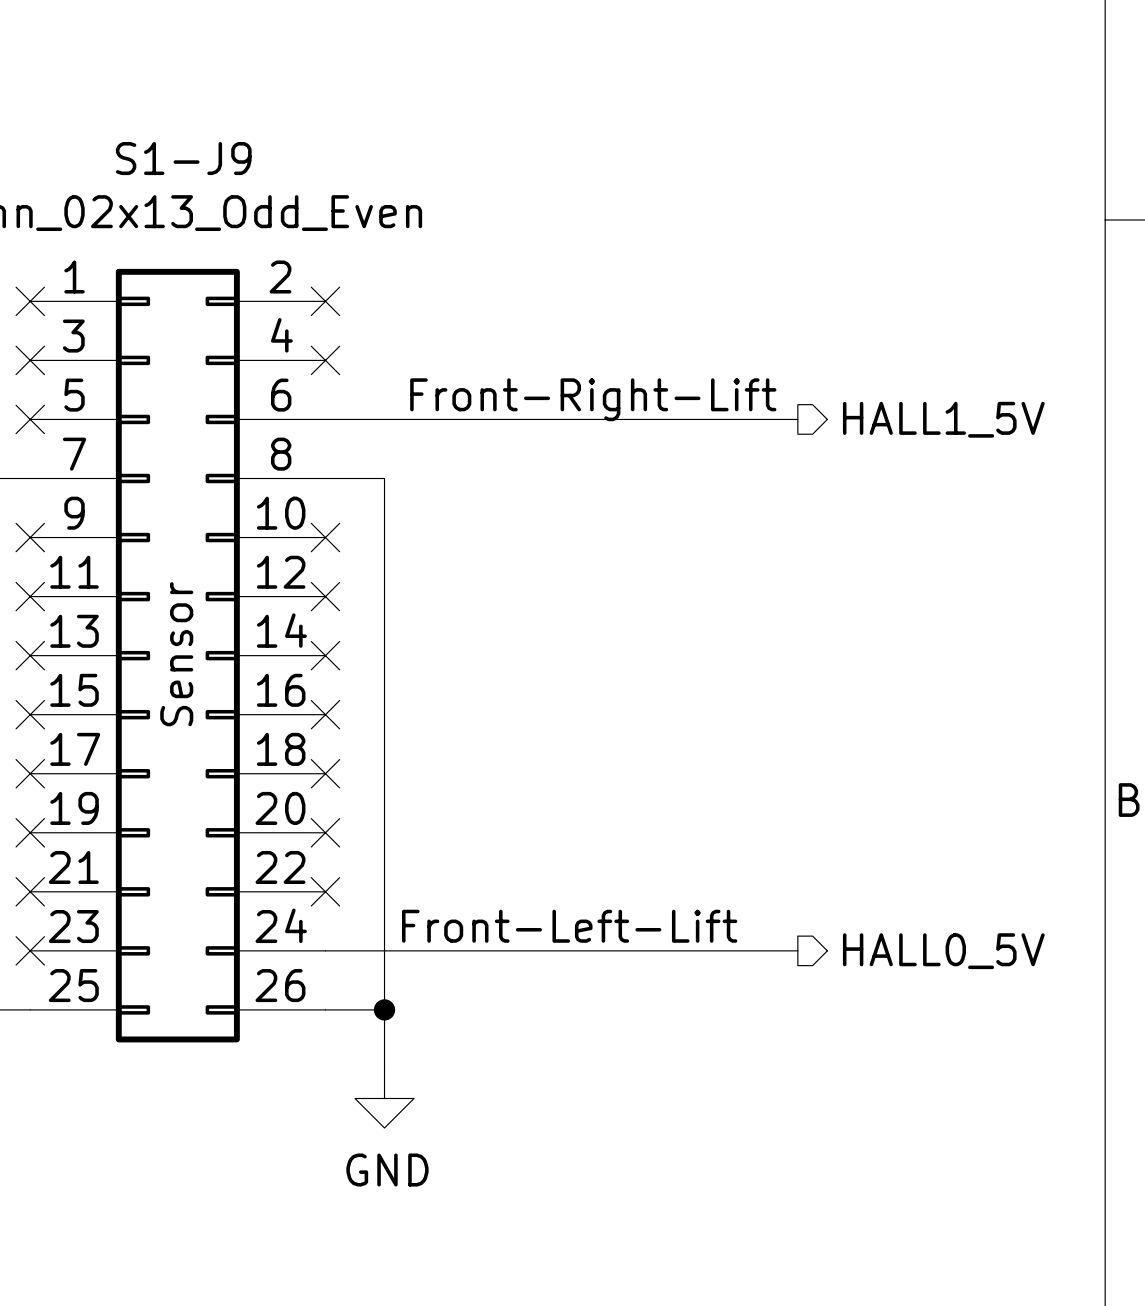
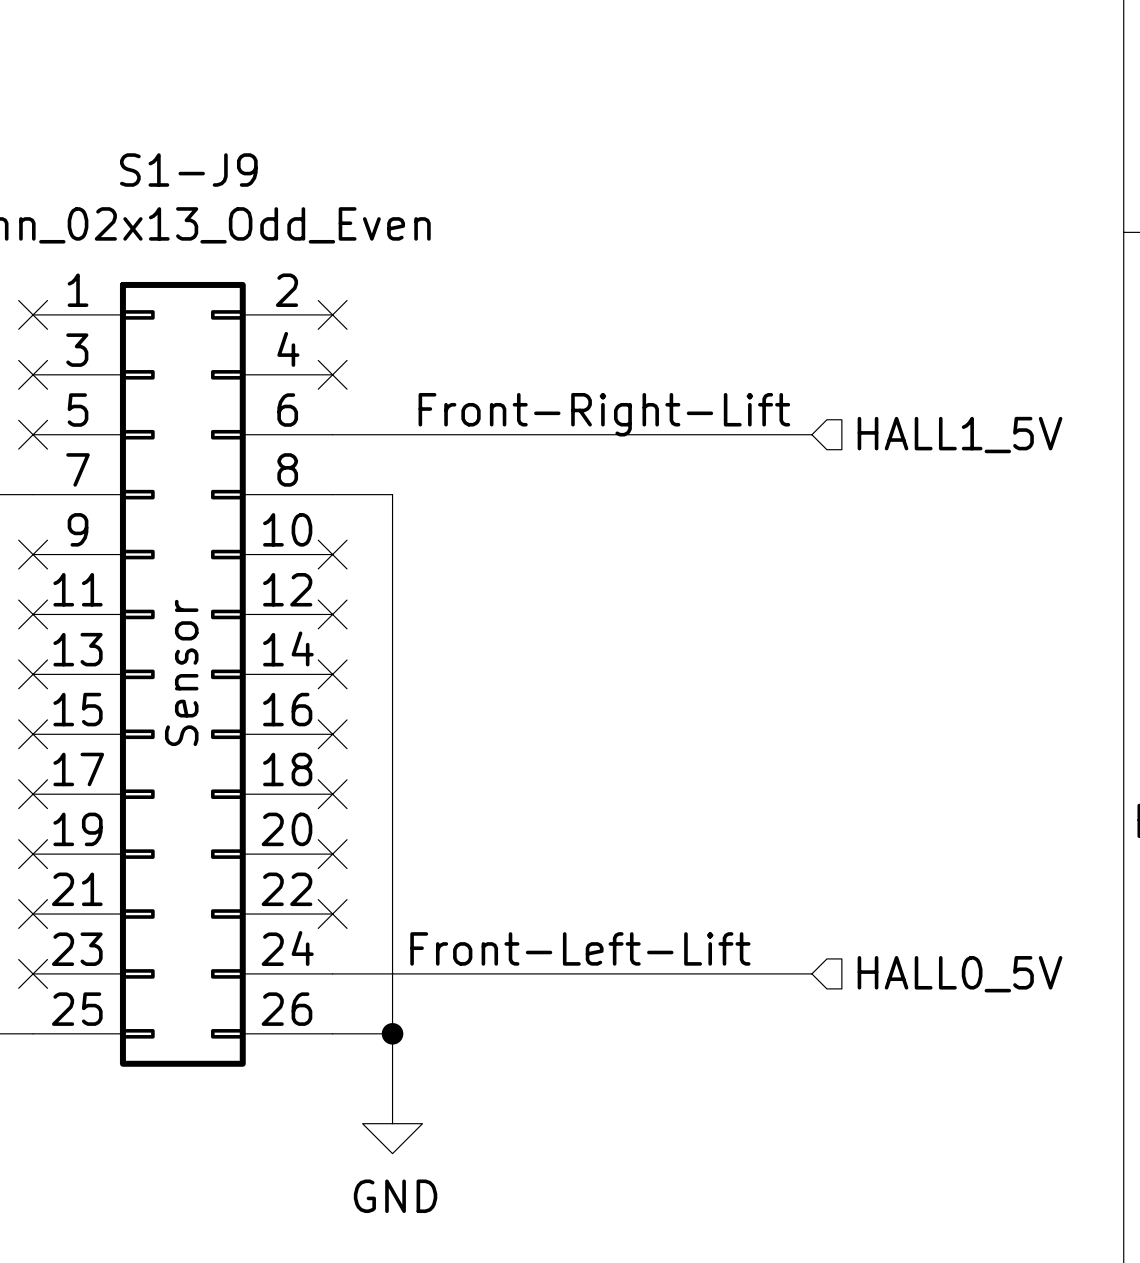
hierarchical label shape: output (943, 419) -> input (960, 435)
hierarchical label shape: output (943, 951) -> input (960, 974)

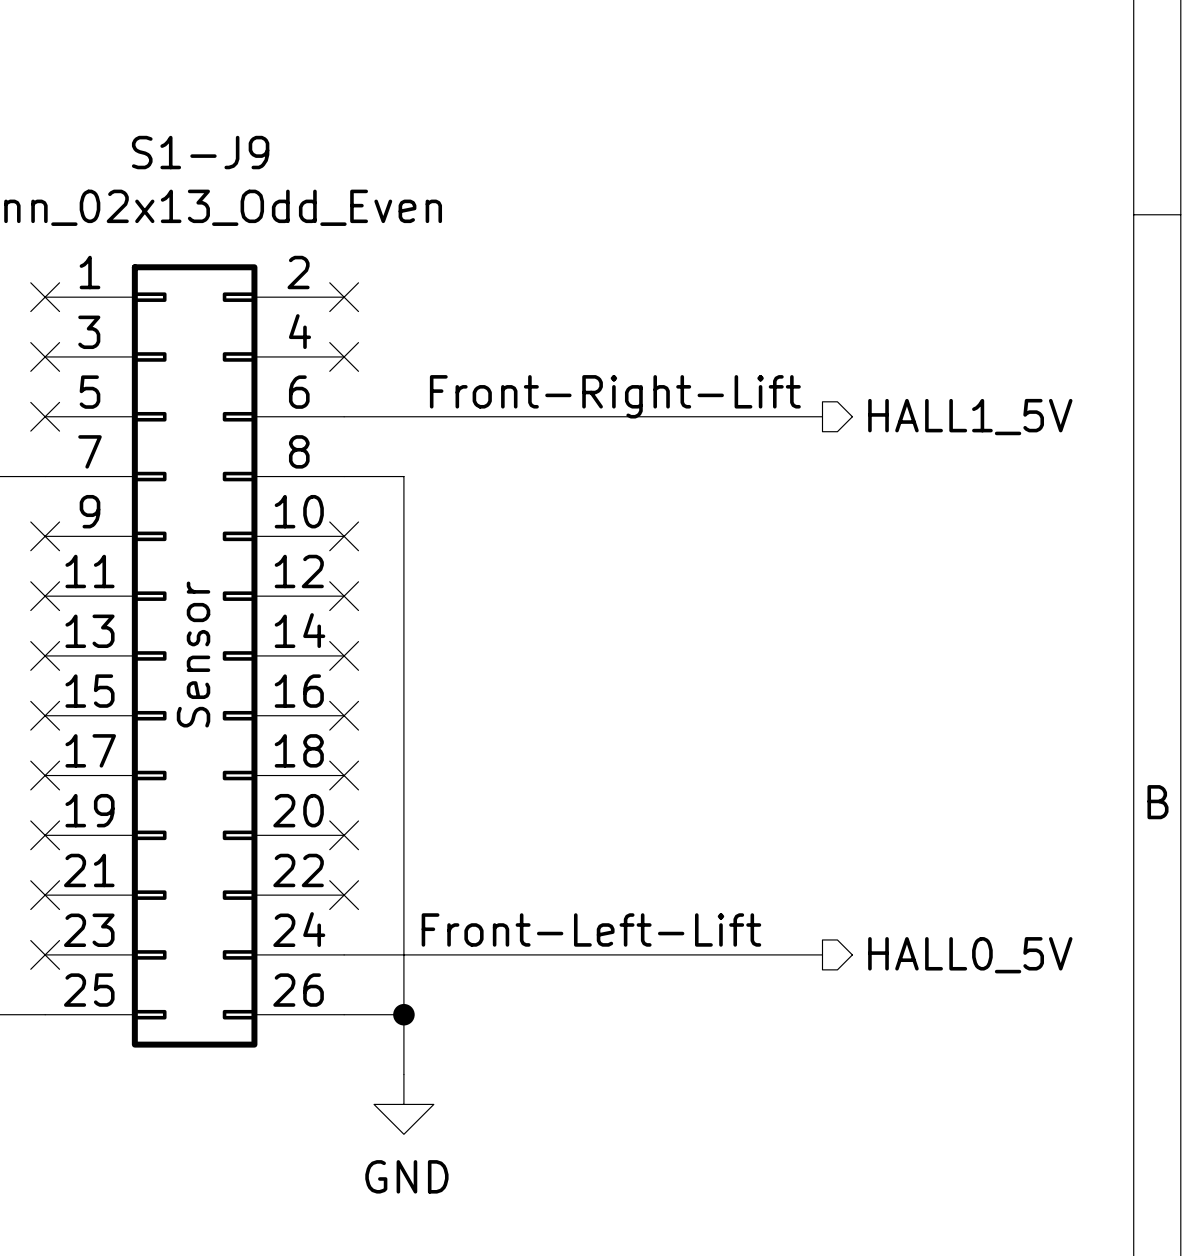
hierarchical label shape: input (960, 435) -> output (970, 417)
hierarchical label shape: input (960, 974) -> output (970, 955)

